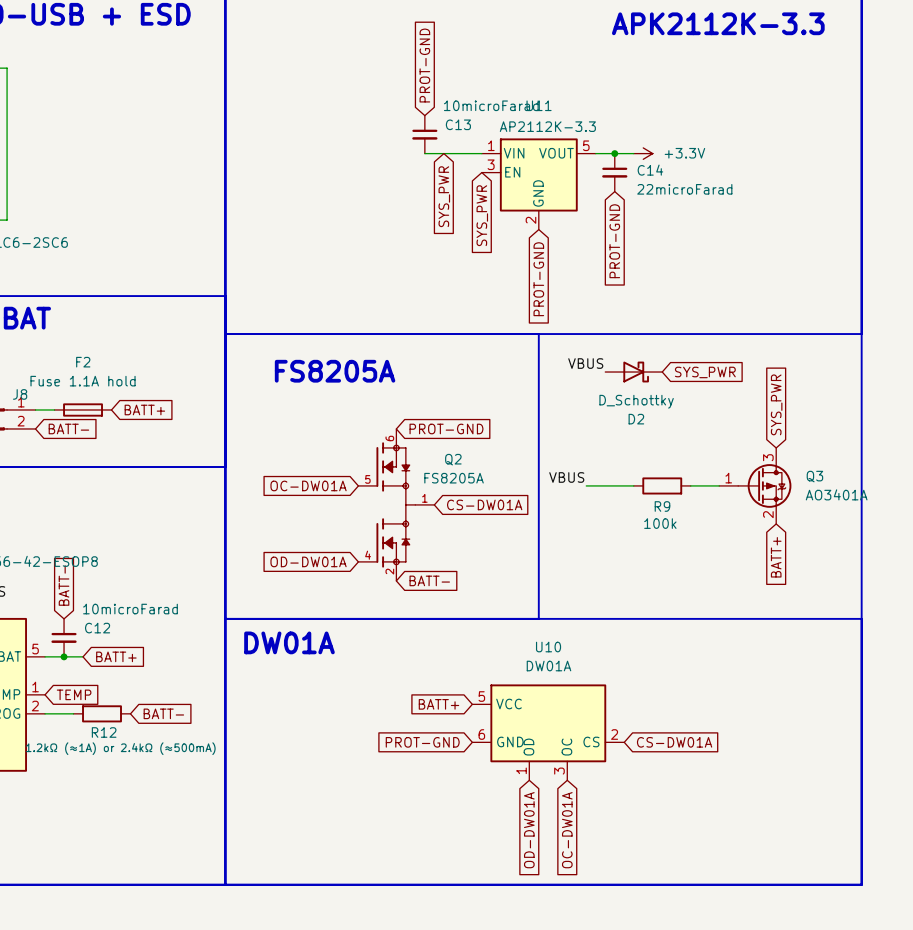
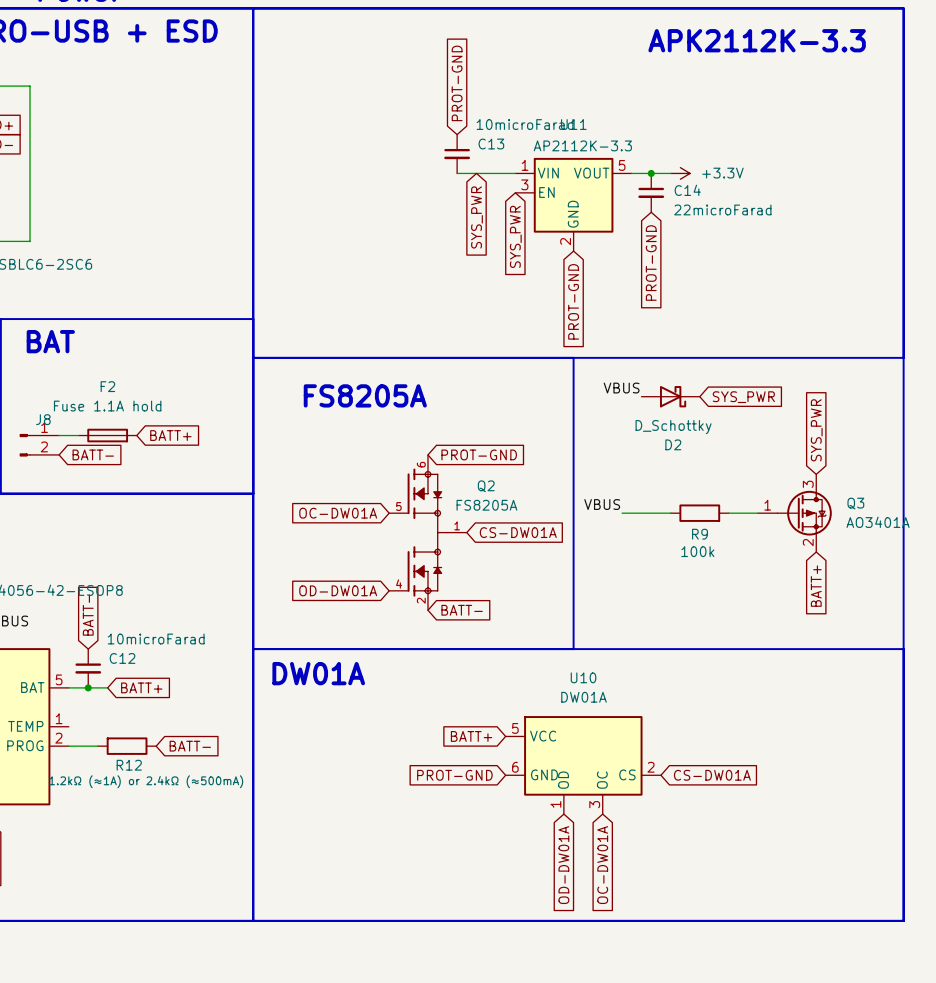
global label: TEMP (74, 694) -> none

